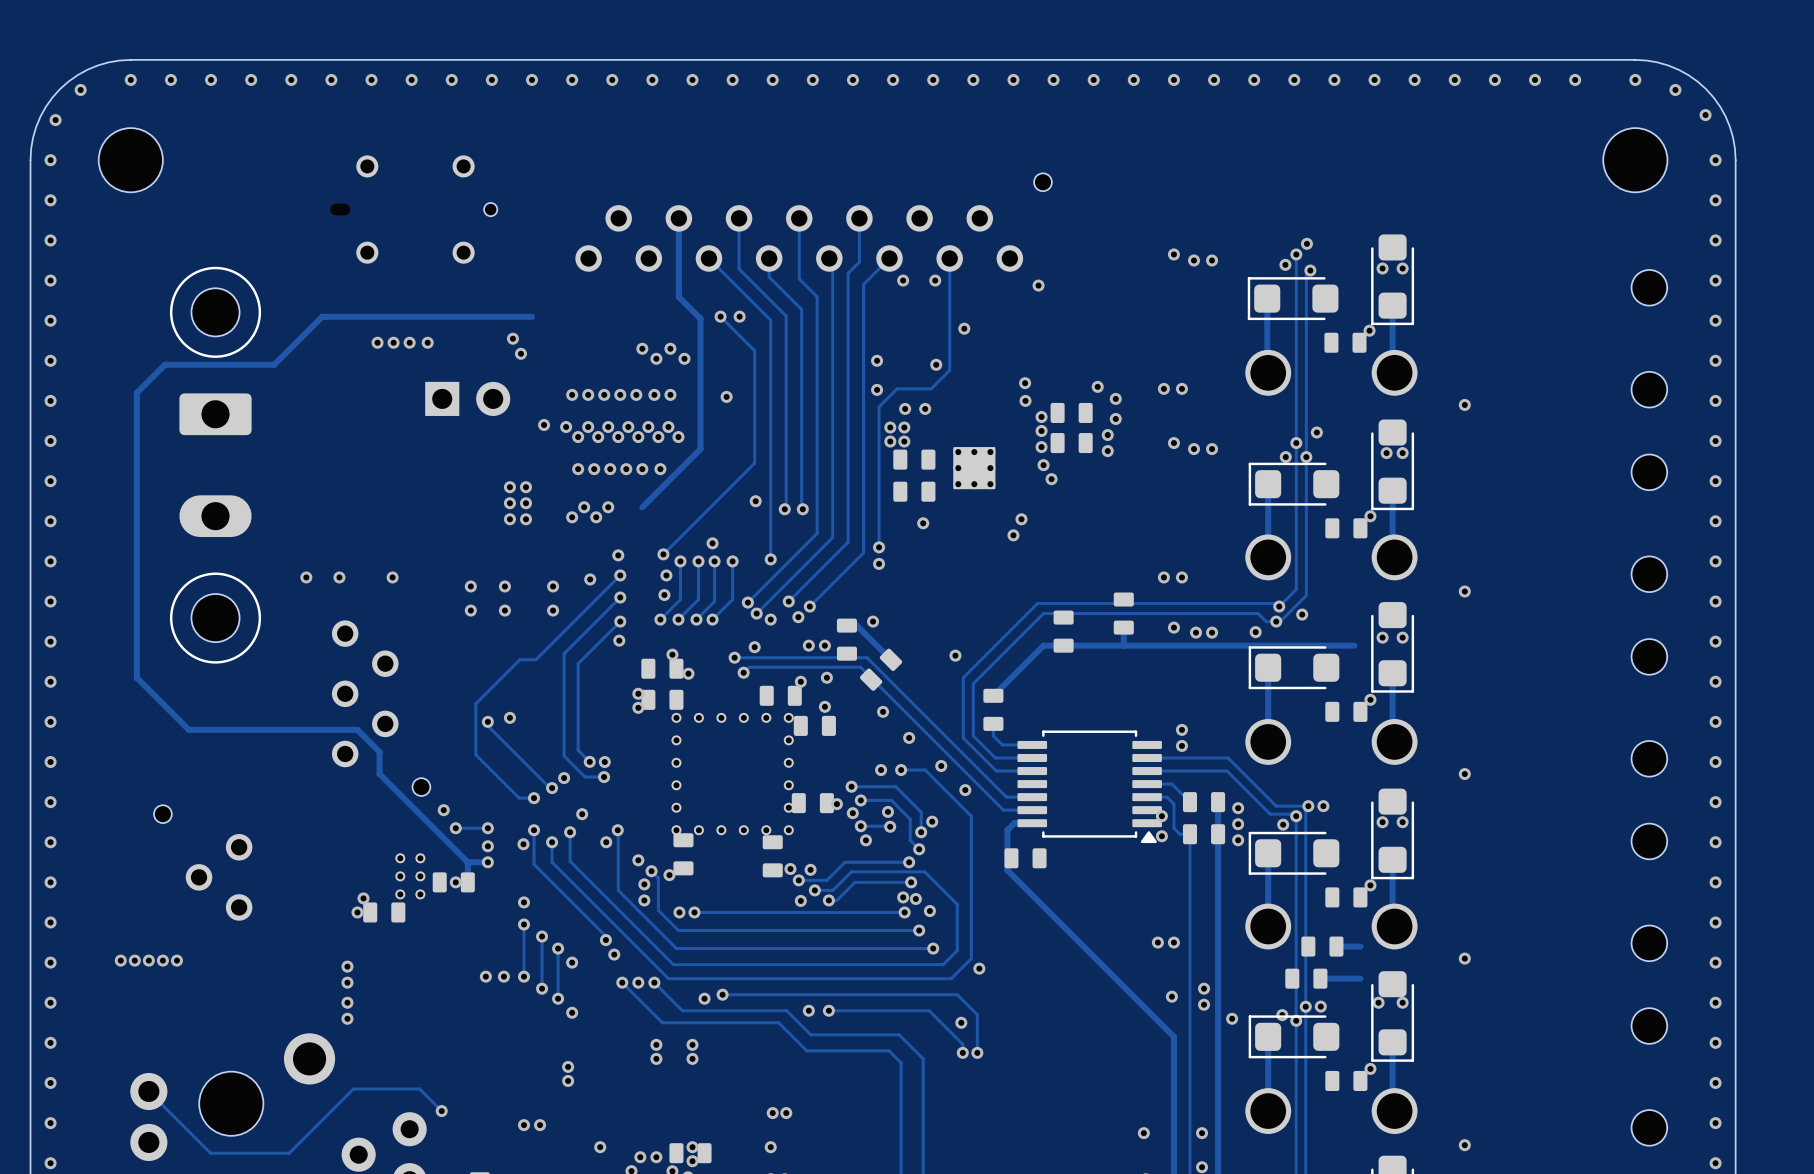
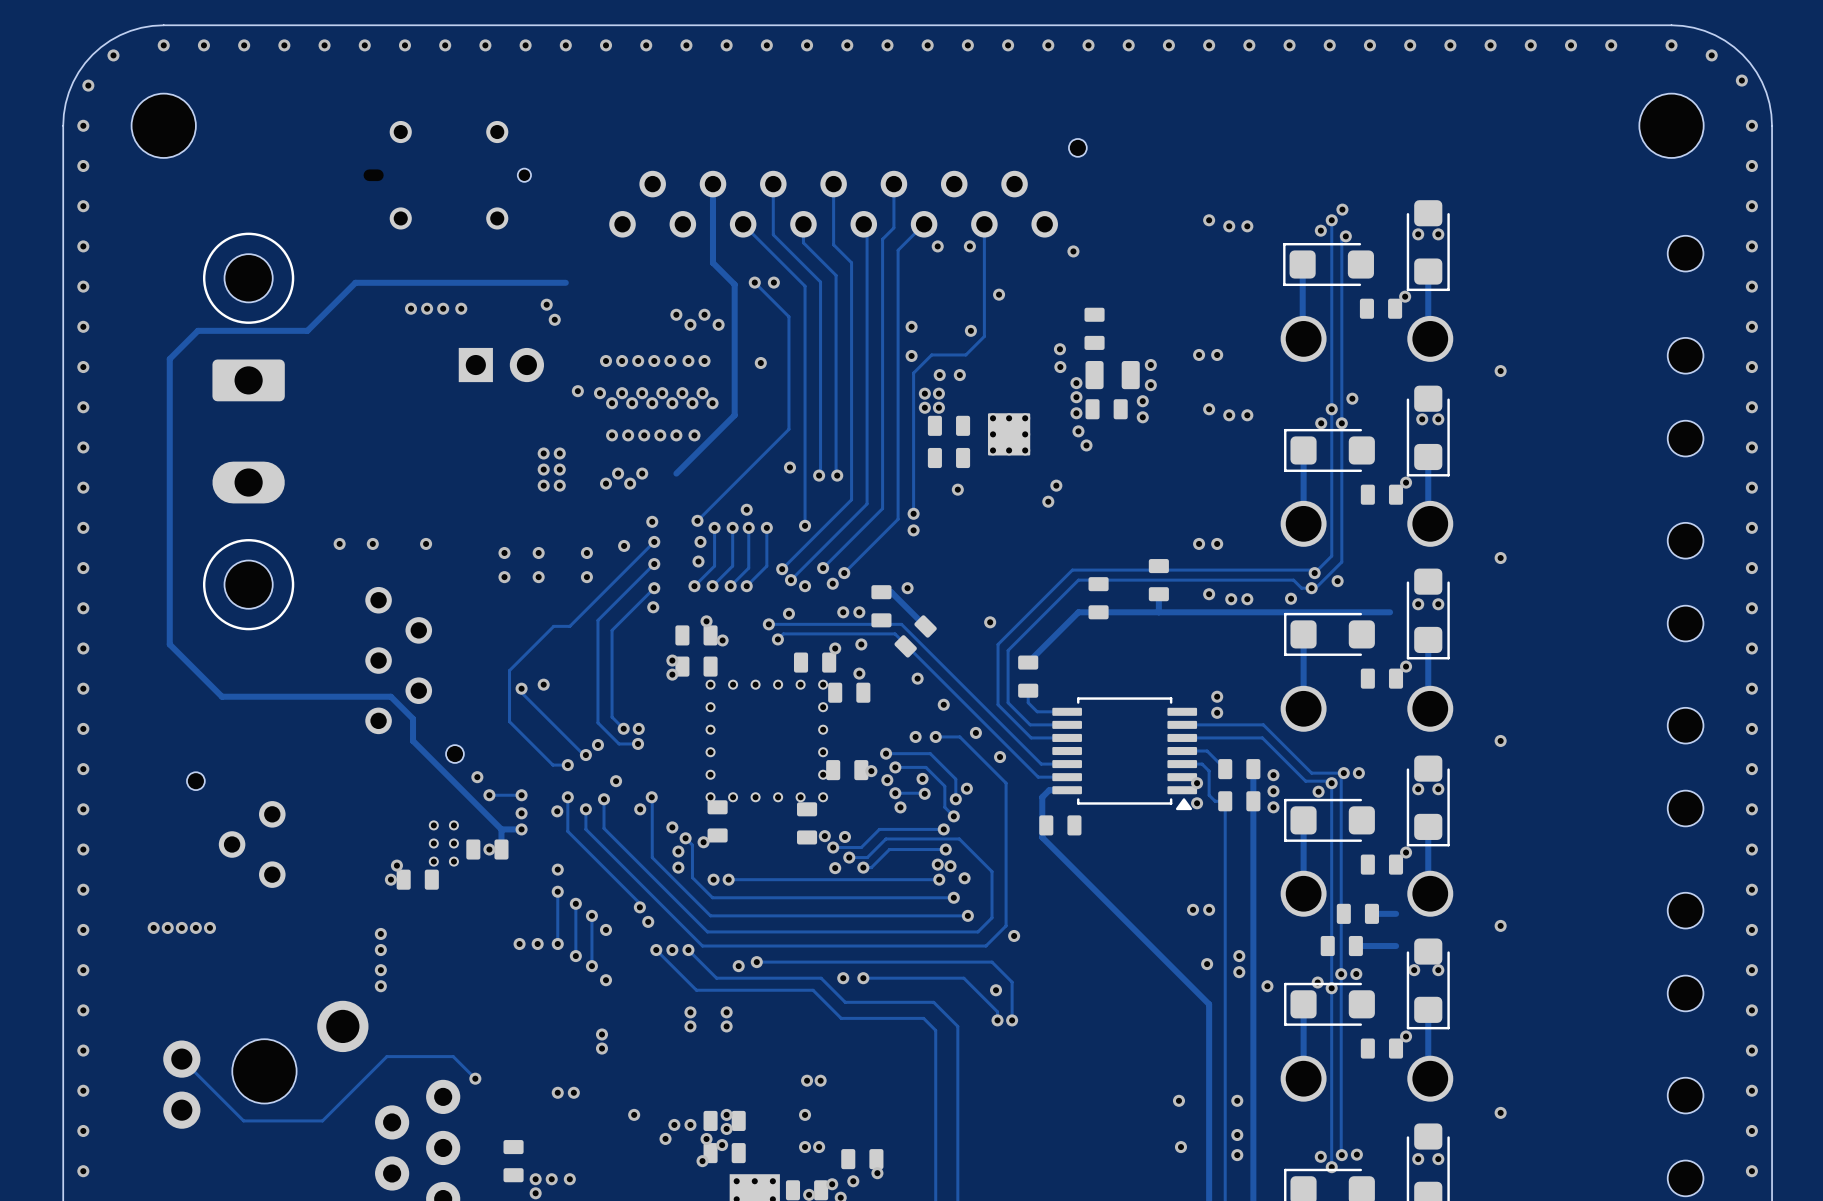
part: none -> (1094, 328)
via: (1097, 386) -> none
part footprint: [1050, 402, 1093, 423] -> [1085, 361, 1140, 390]

